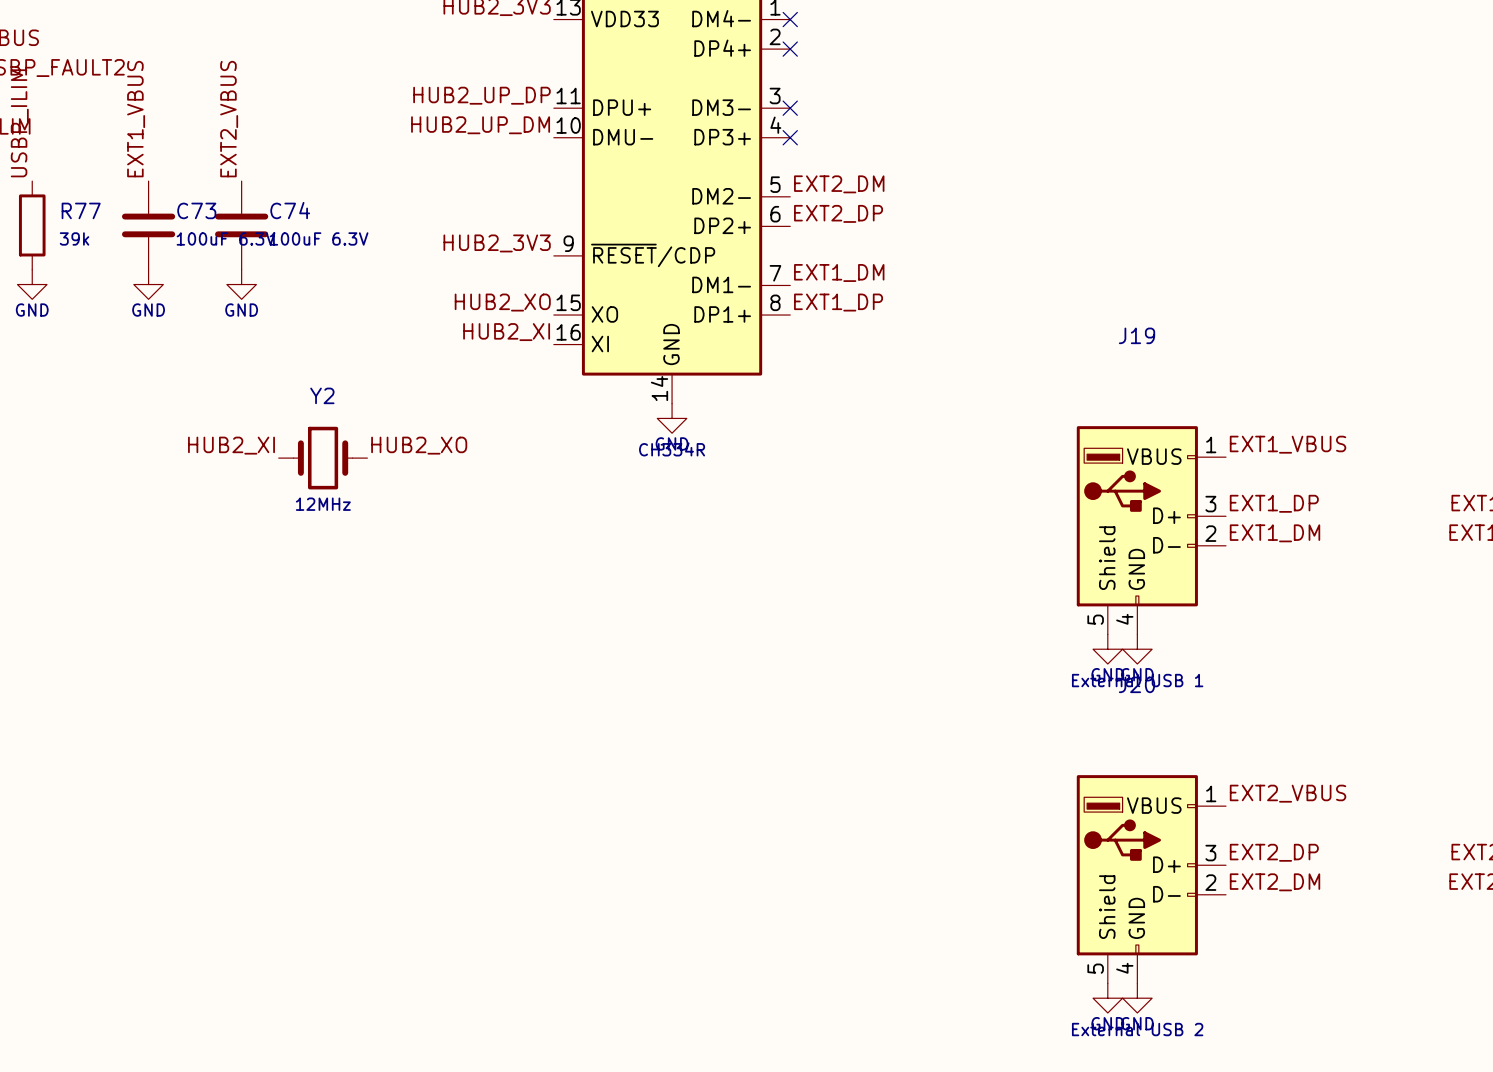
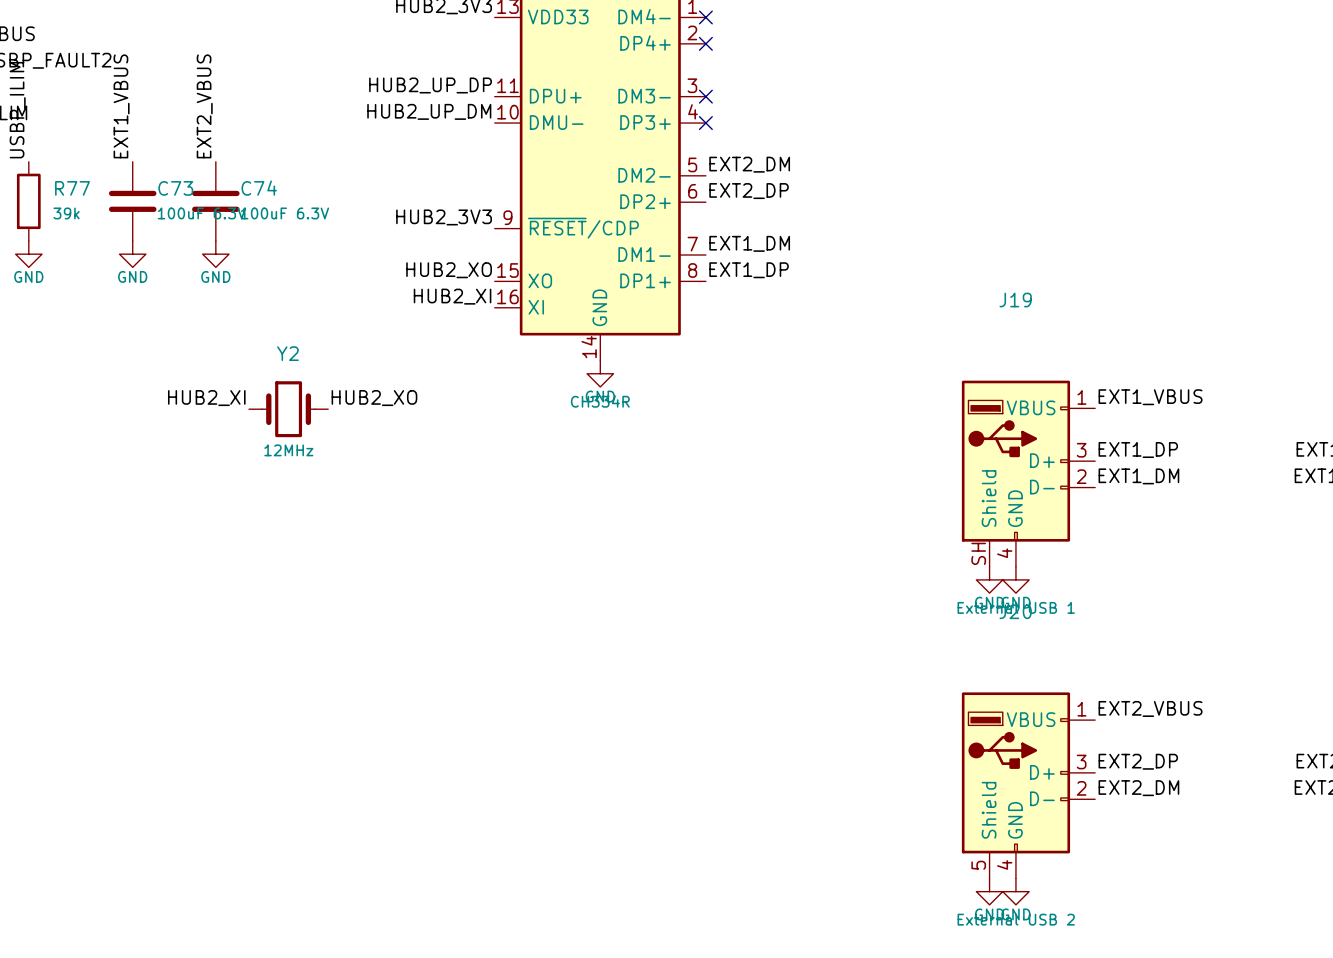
J19 pin number: 5 (1095, 619) -> SH (978, 553)

